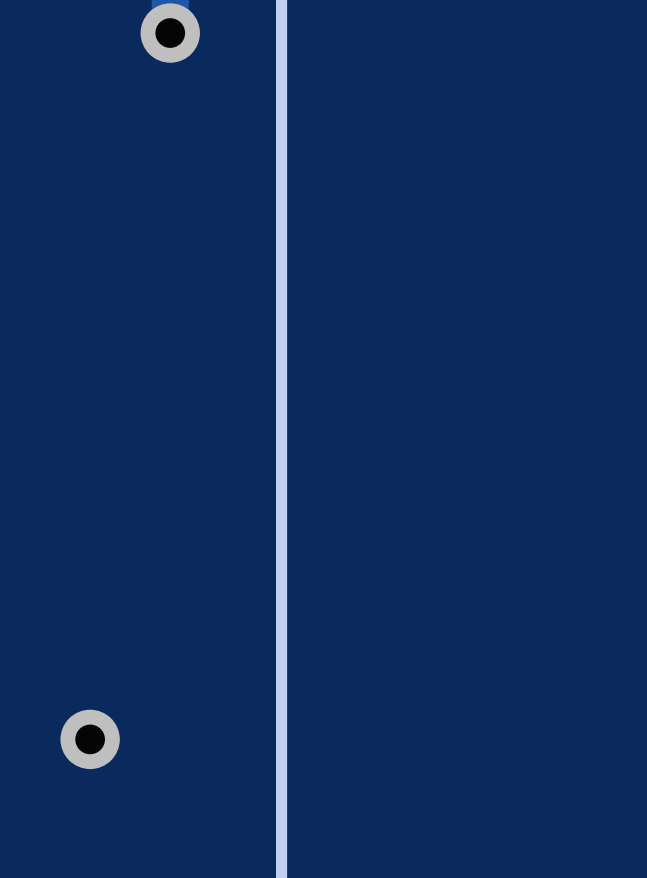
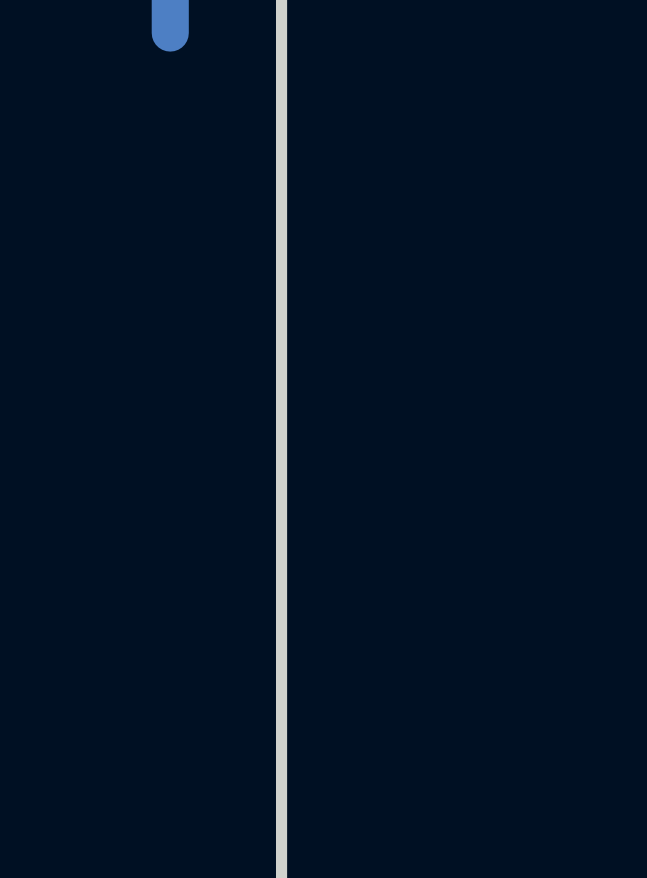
via: (170, 33) -> none
via: (90, 739) -> none

